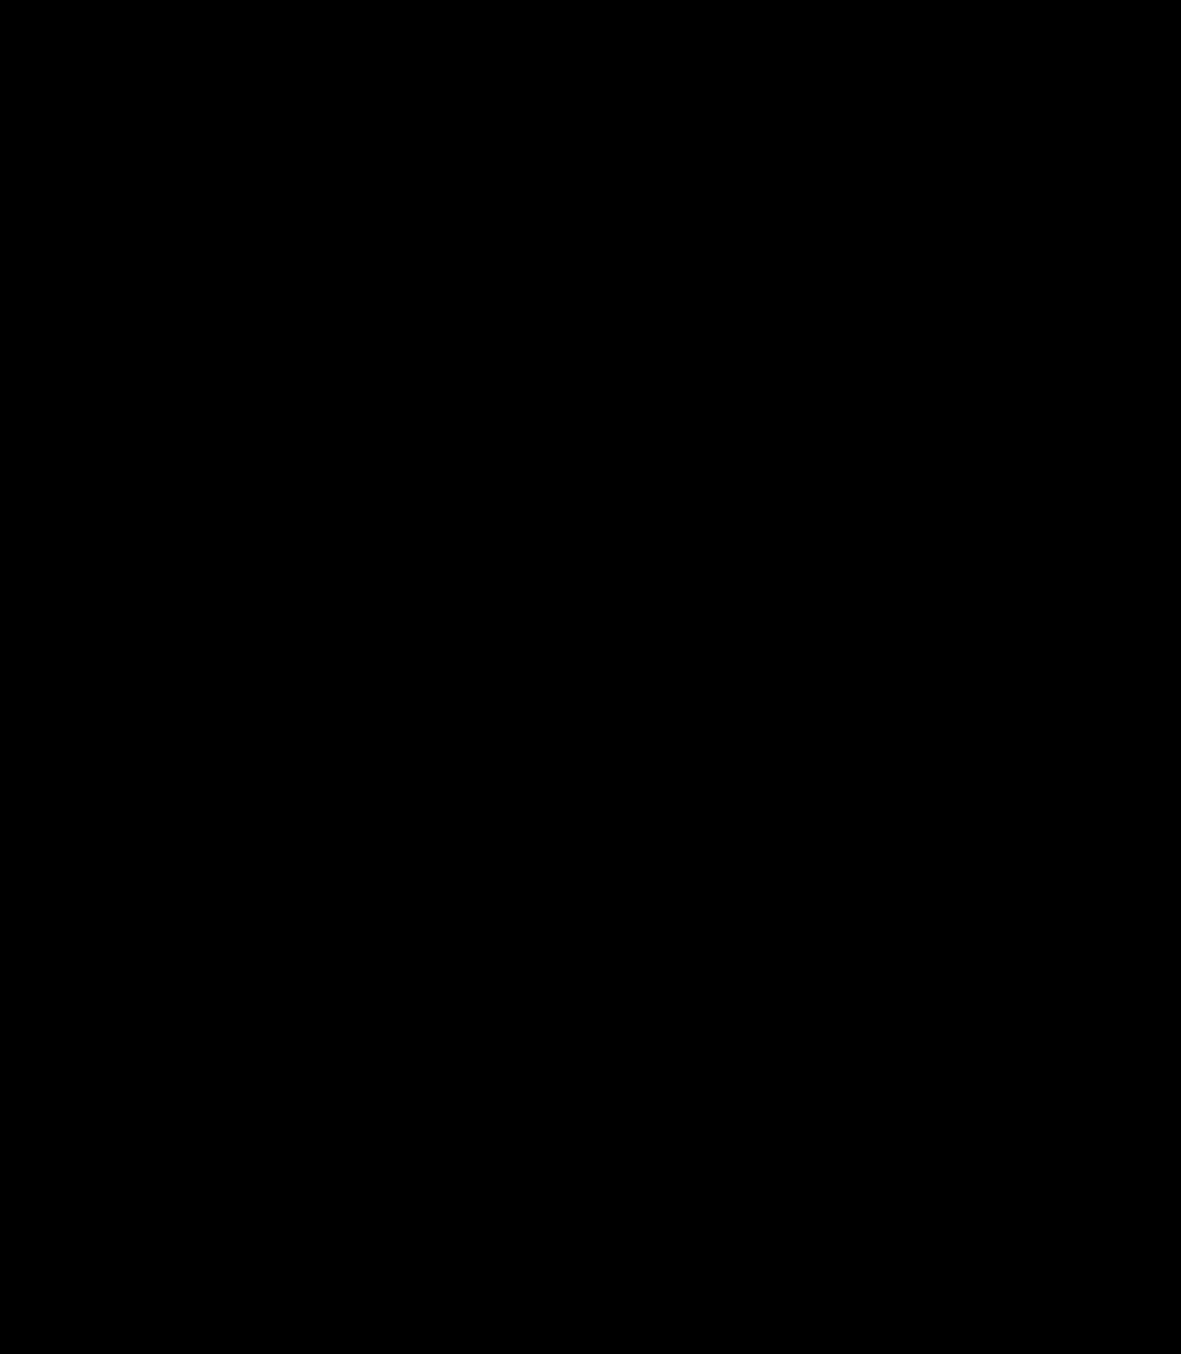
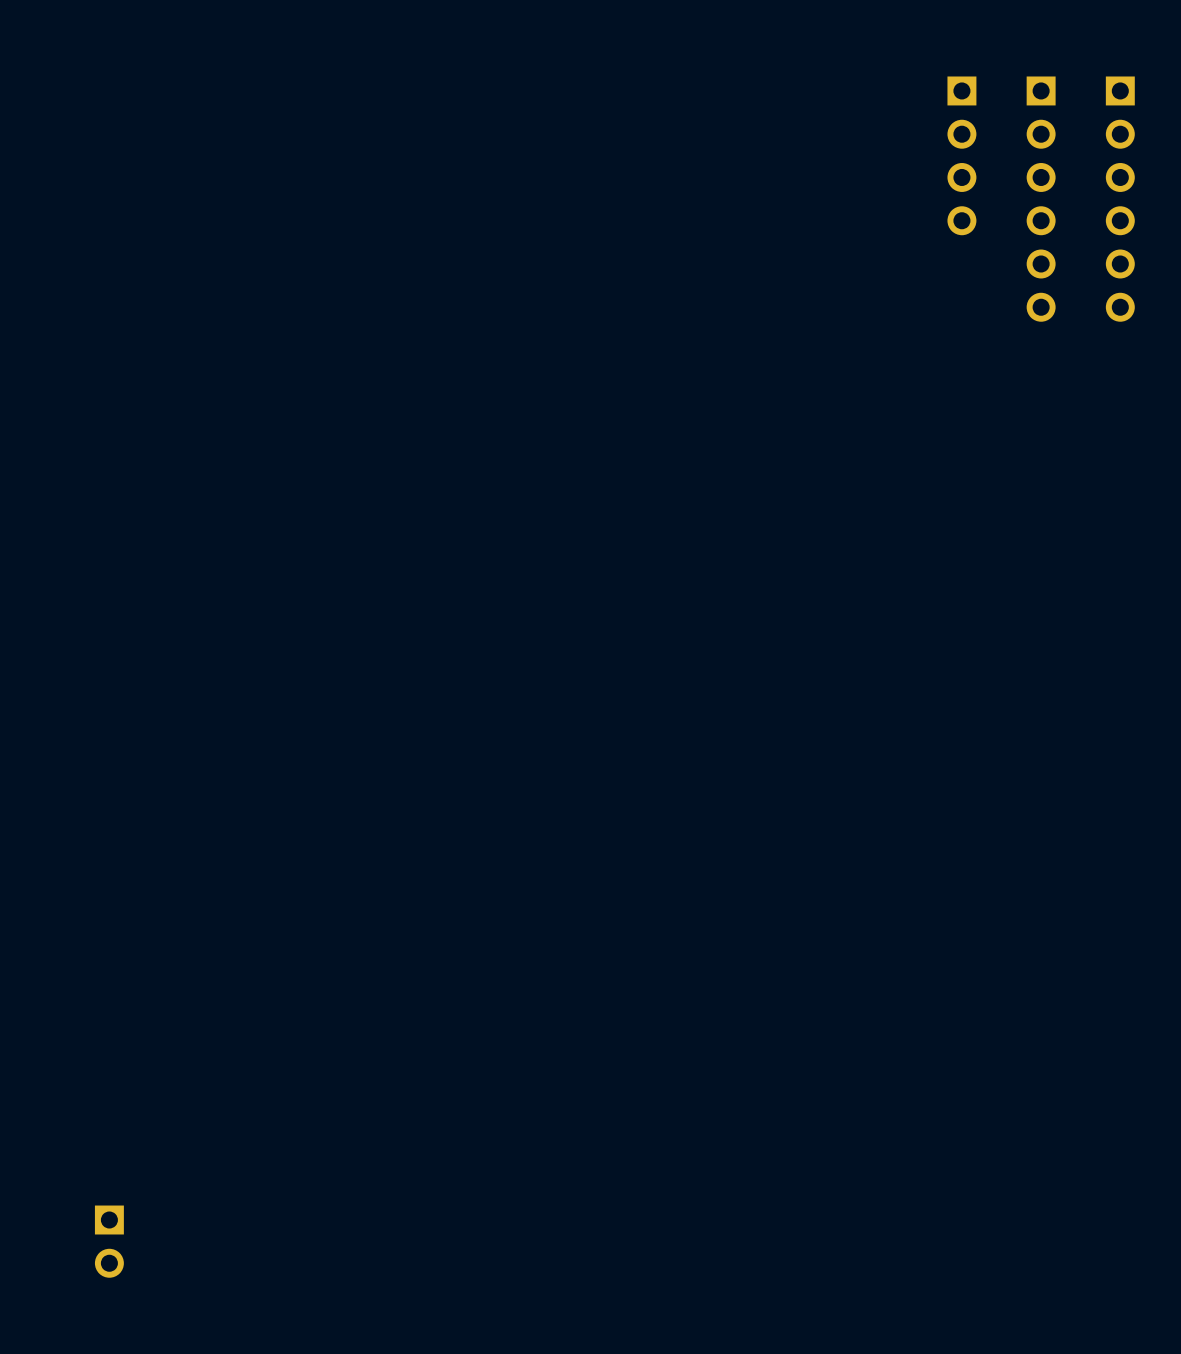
part: none -> (961, 155)
part: none -> (1041, 199)
part: none -> (1120, 199)
part: none -> (109, 1241)

